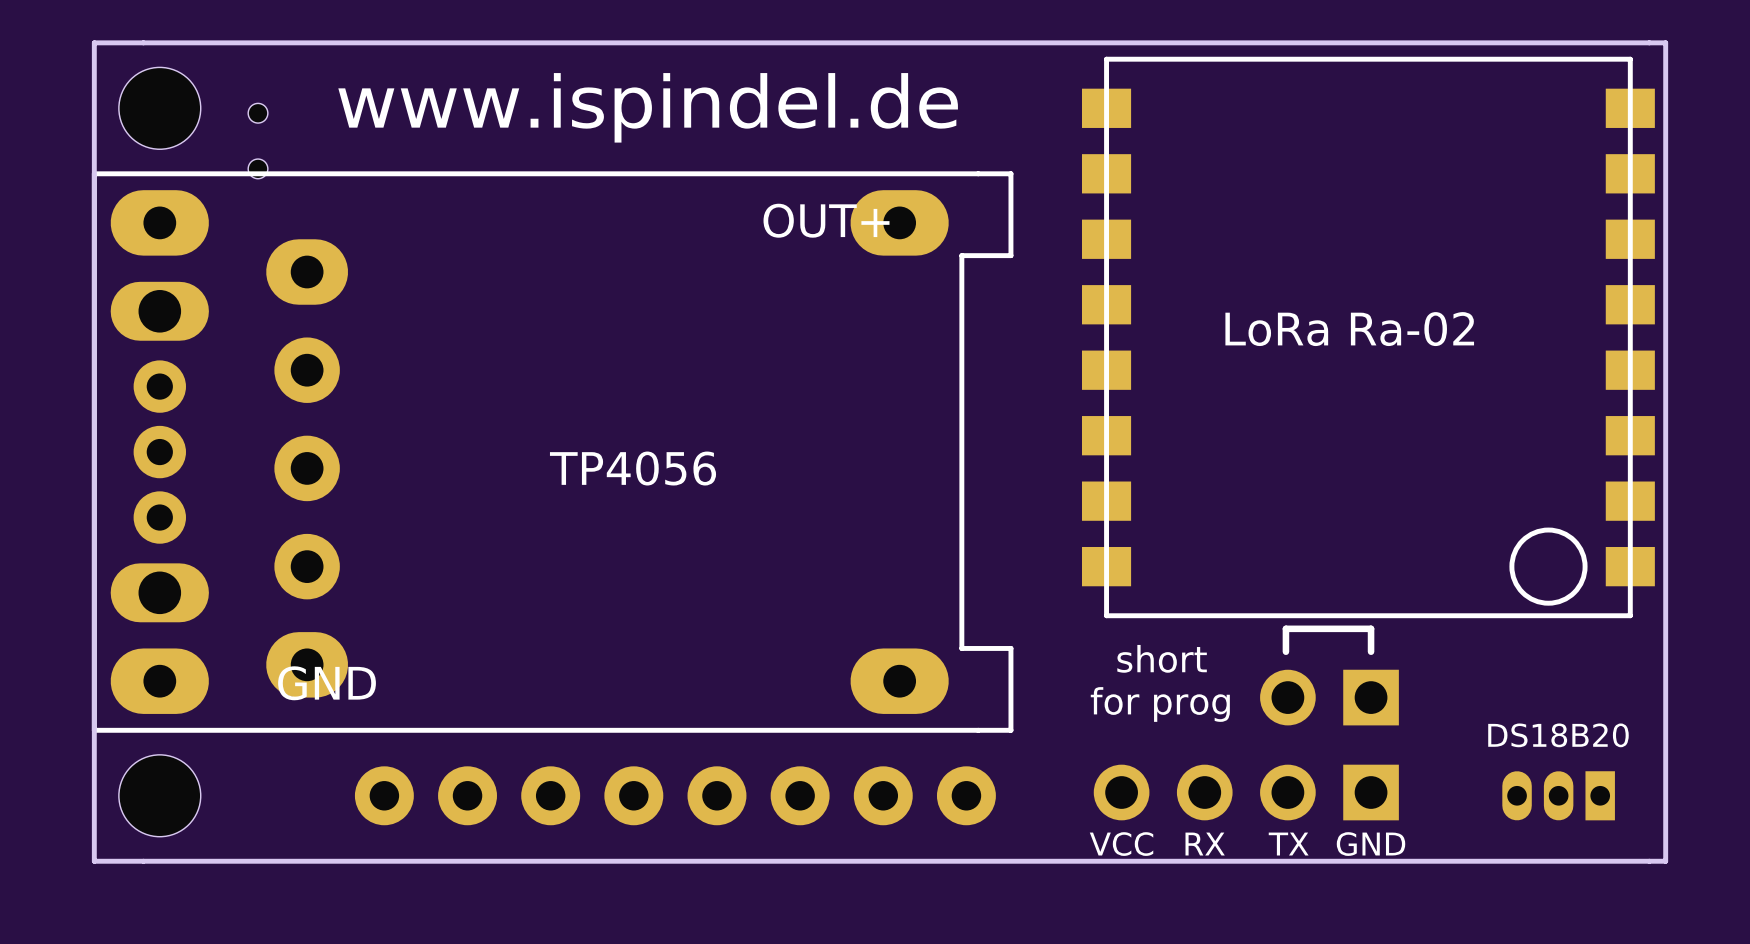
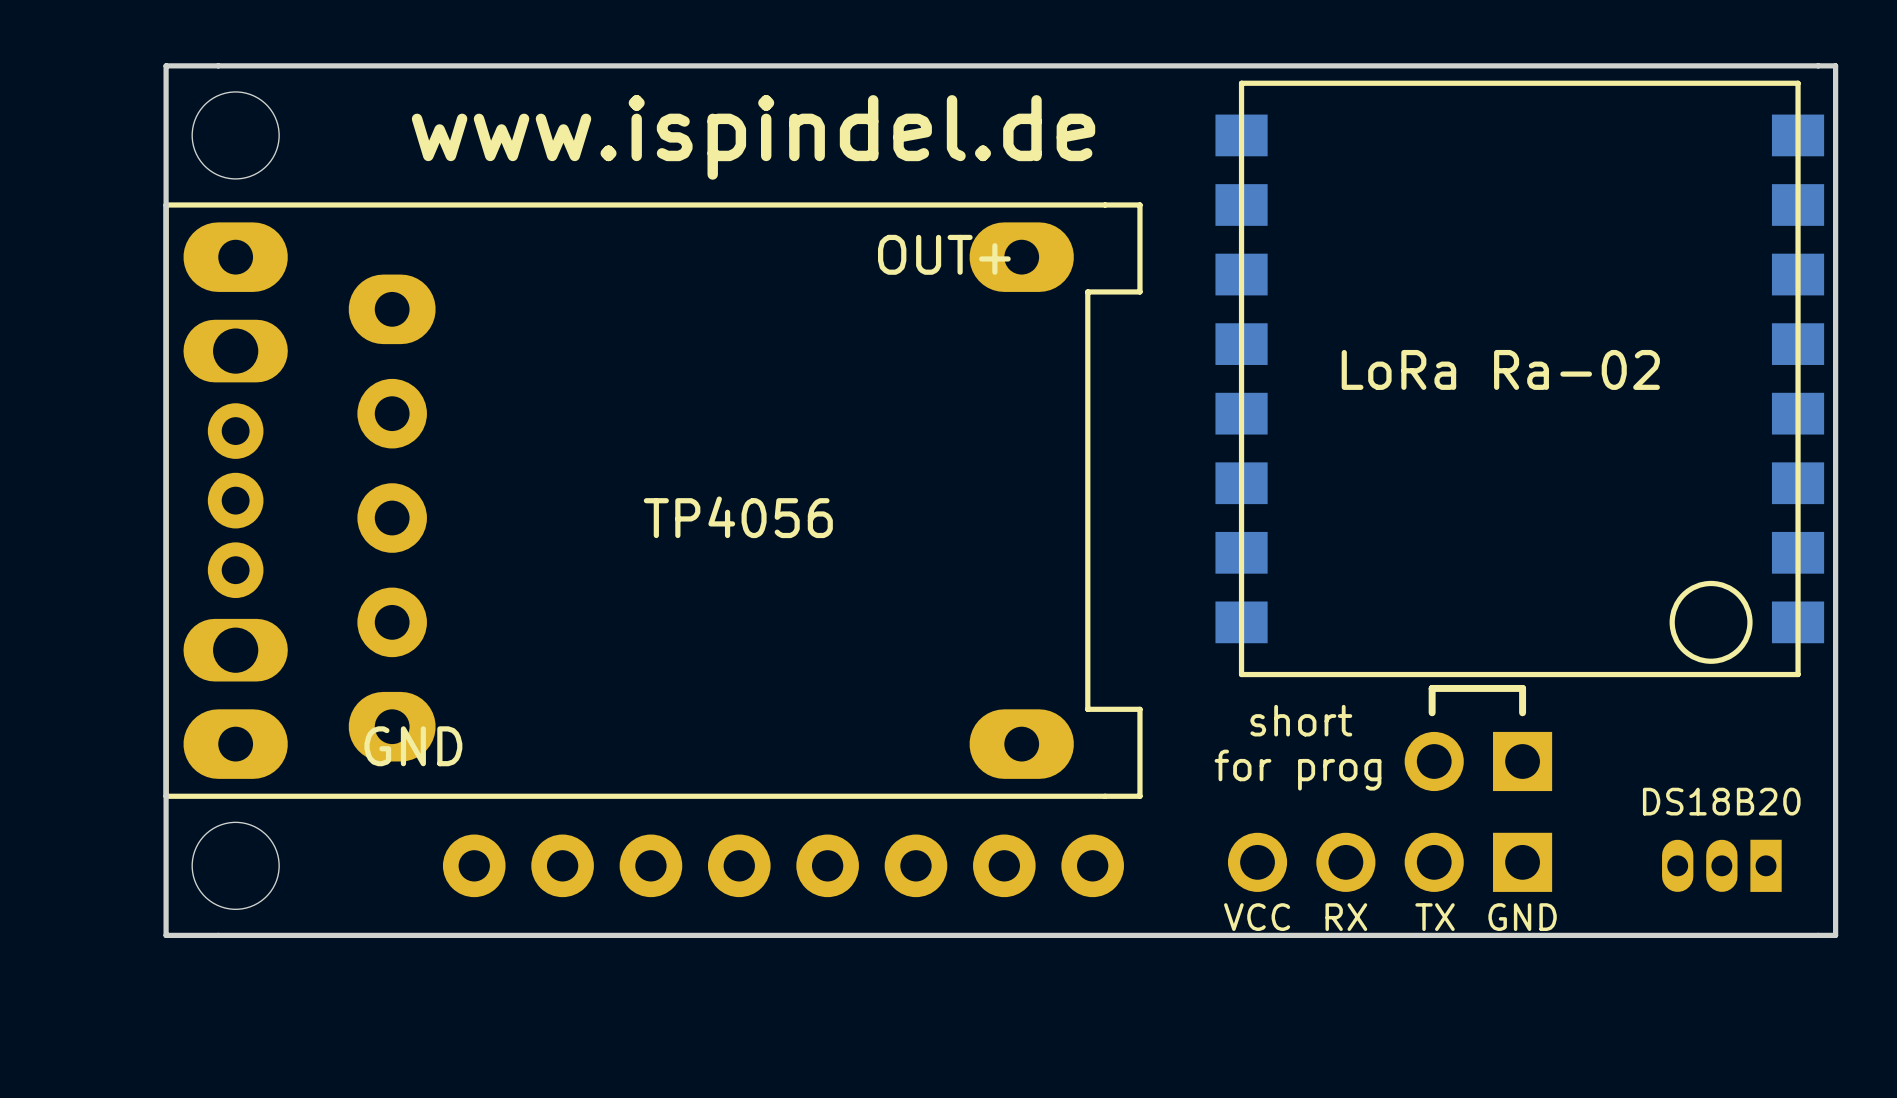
part: (258, 141) -> none

